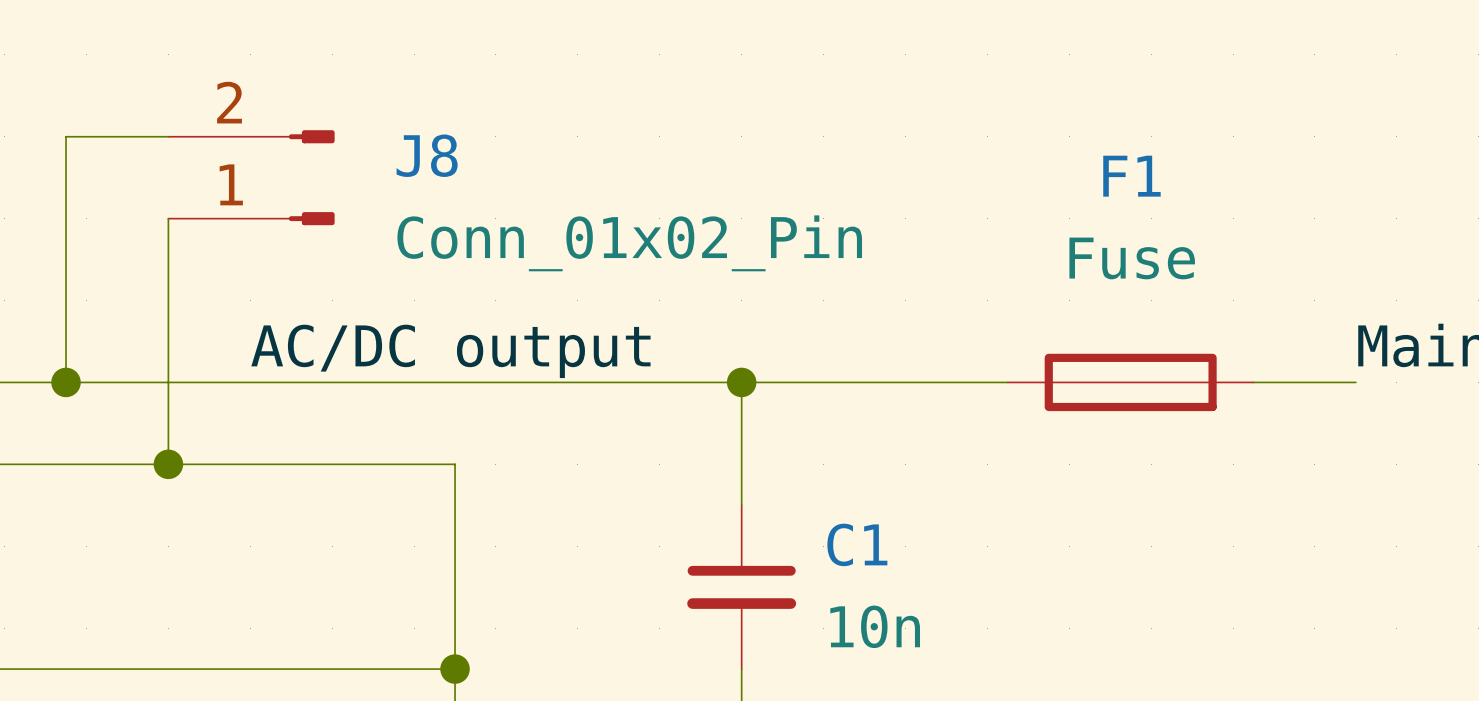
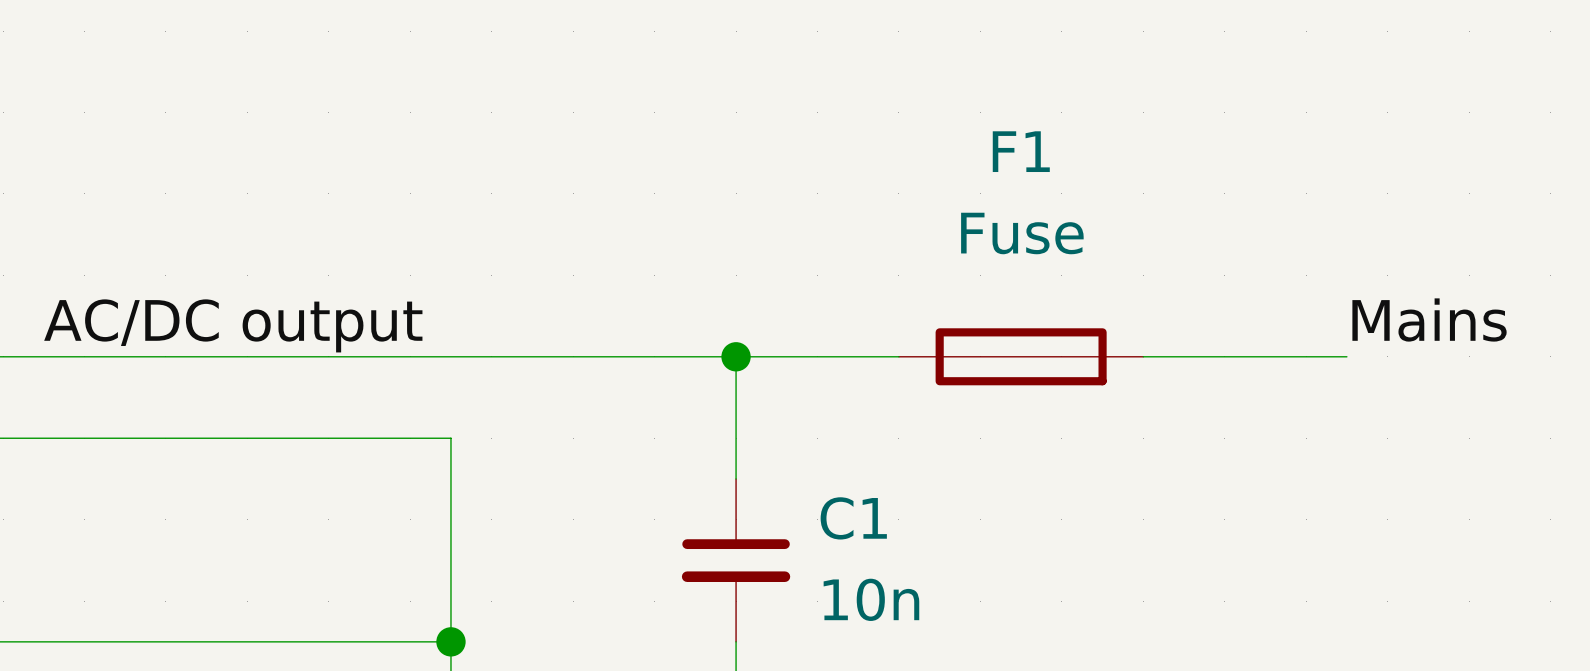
wire: (168, 136) (66, 136) (66, 382) -> none
J8: Conn_01x02_Pin (251, 177) -> none
wire: (168, 218) (168, 464) -> none
label position: AC/DC output (450, 351) -> AC/DC output (233, 325)
junction: (66, 382) -> none
F1 position: (1130, 382) -> (1021, 356)
junction: (168, 464) -> none

